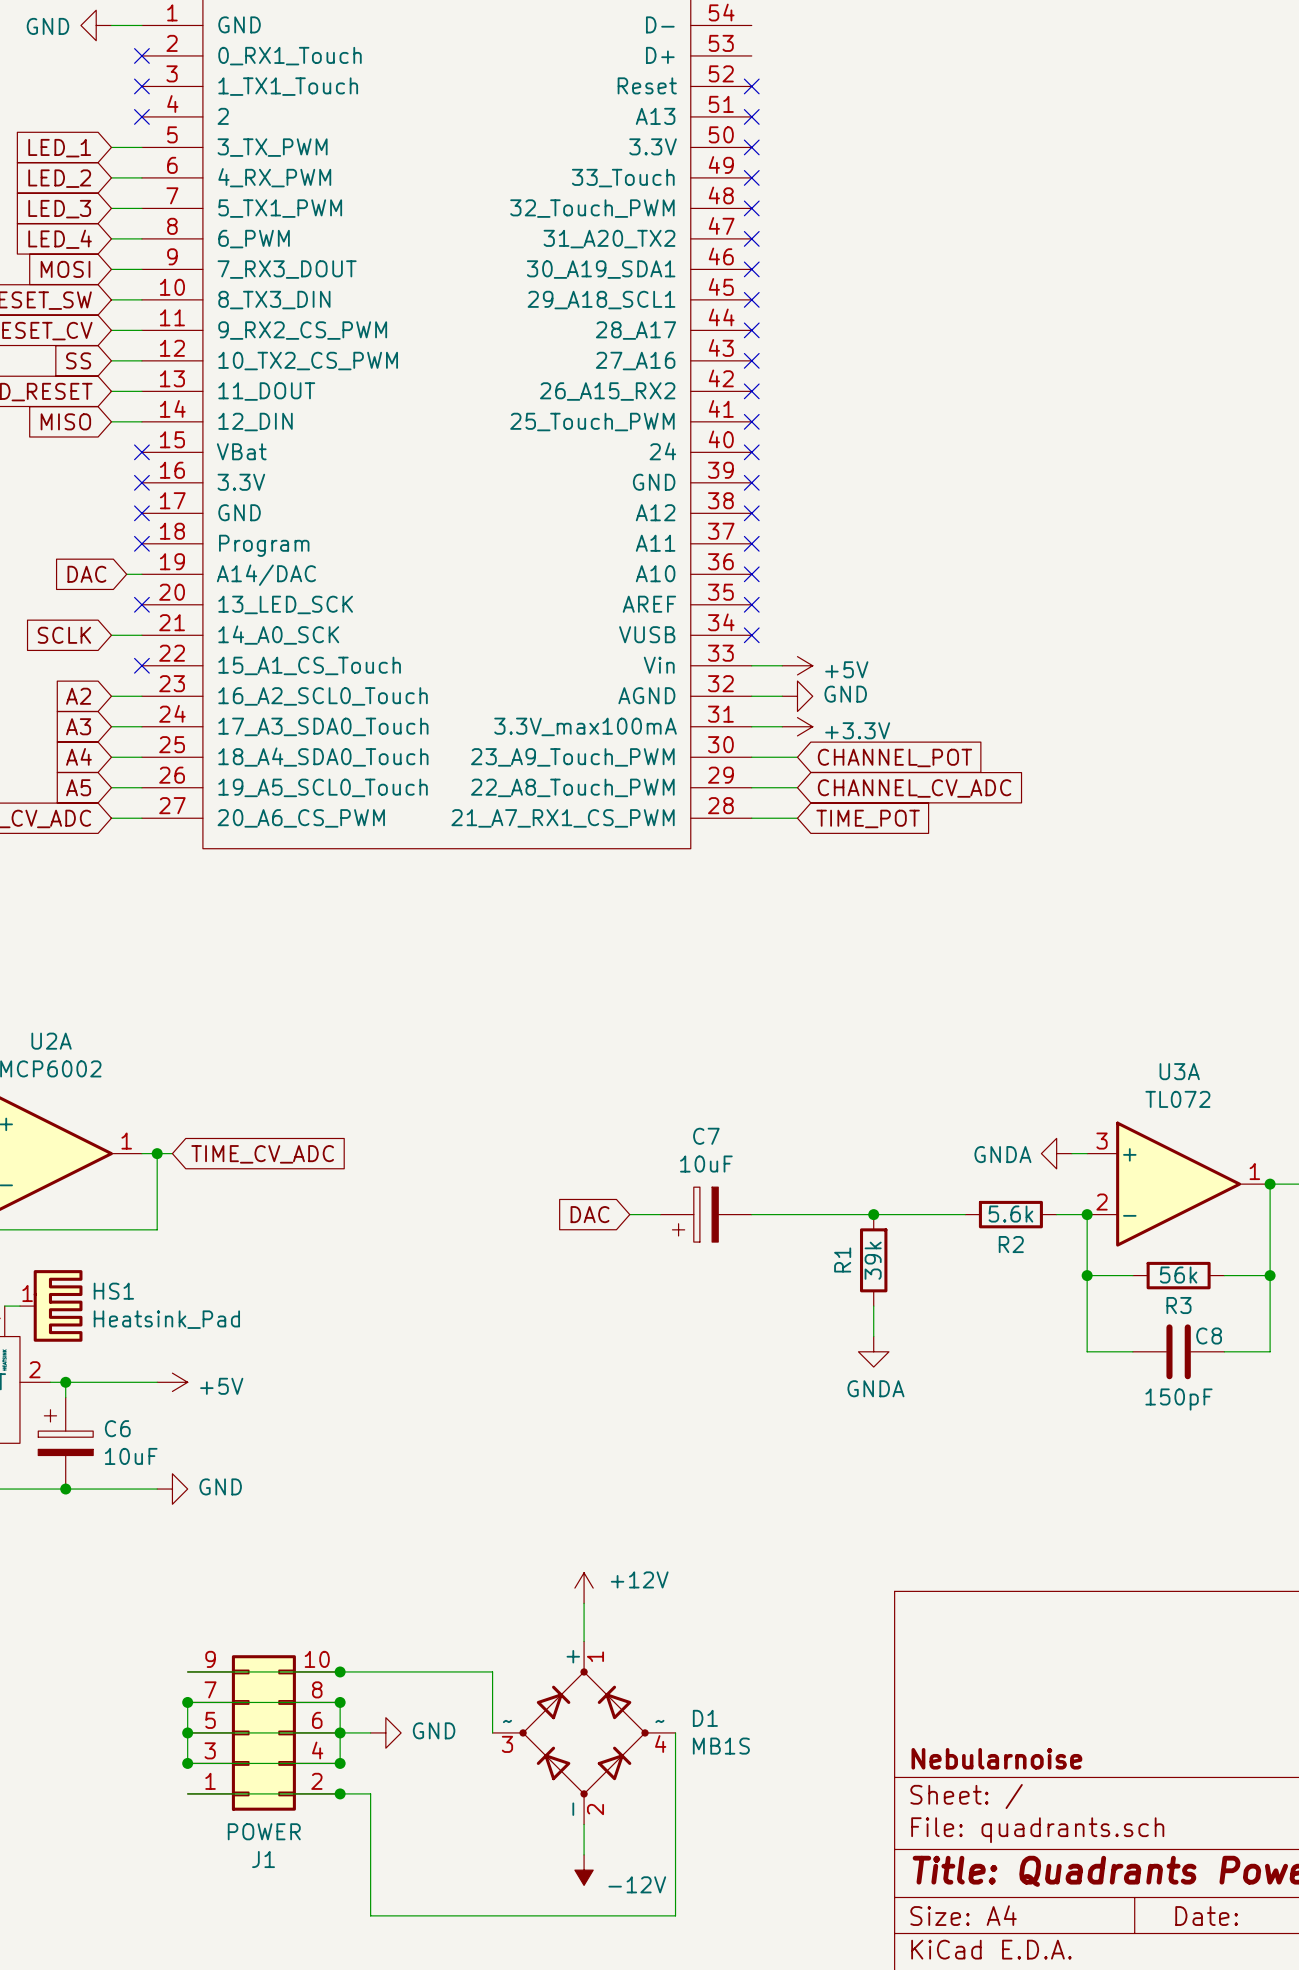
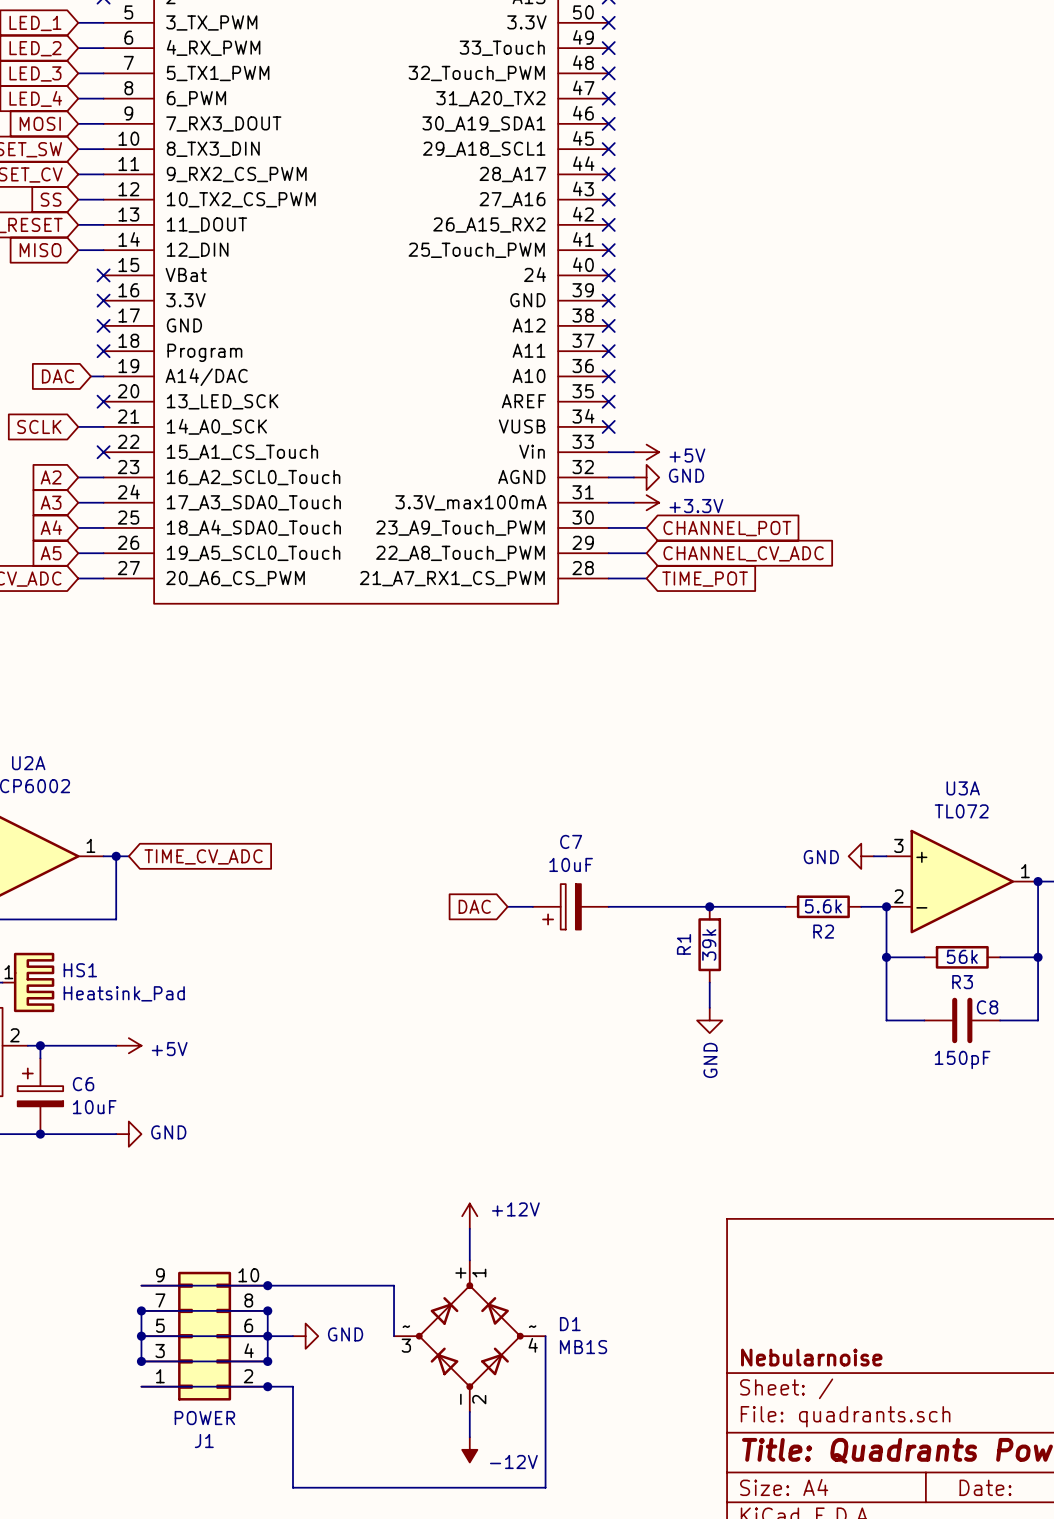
power symbol: GNDA (1056, 1153) -> GND (861, 856)
power symbol: GNDA (873, 1351) -> GND (709, 1020)

